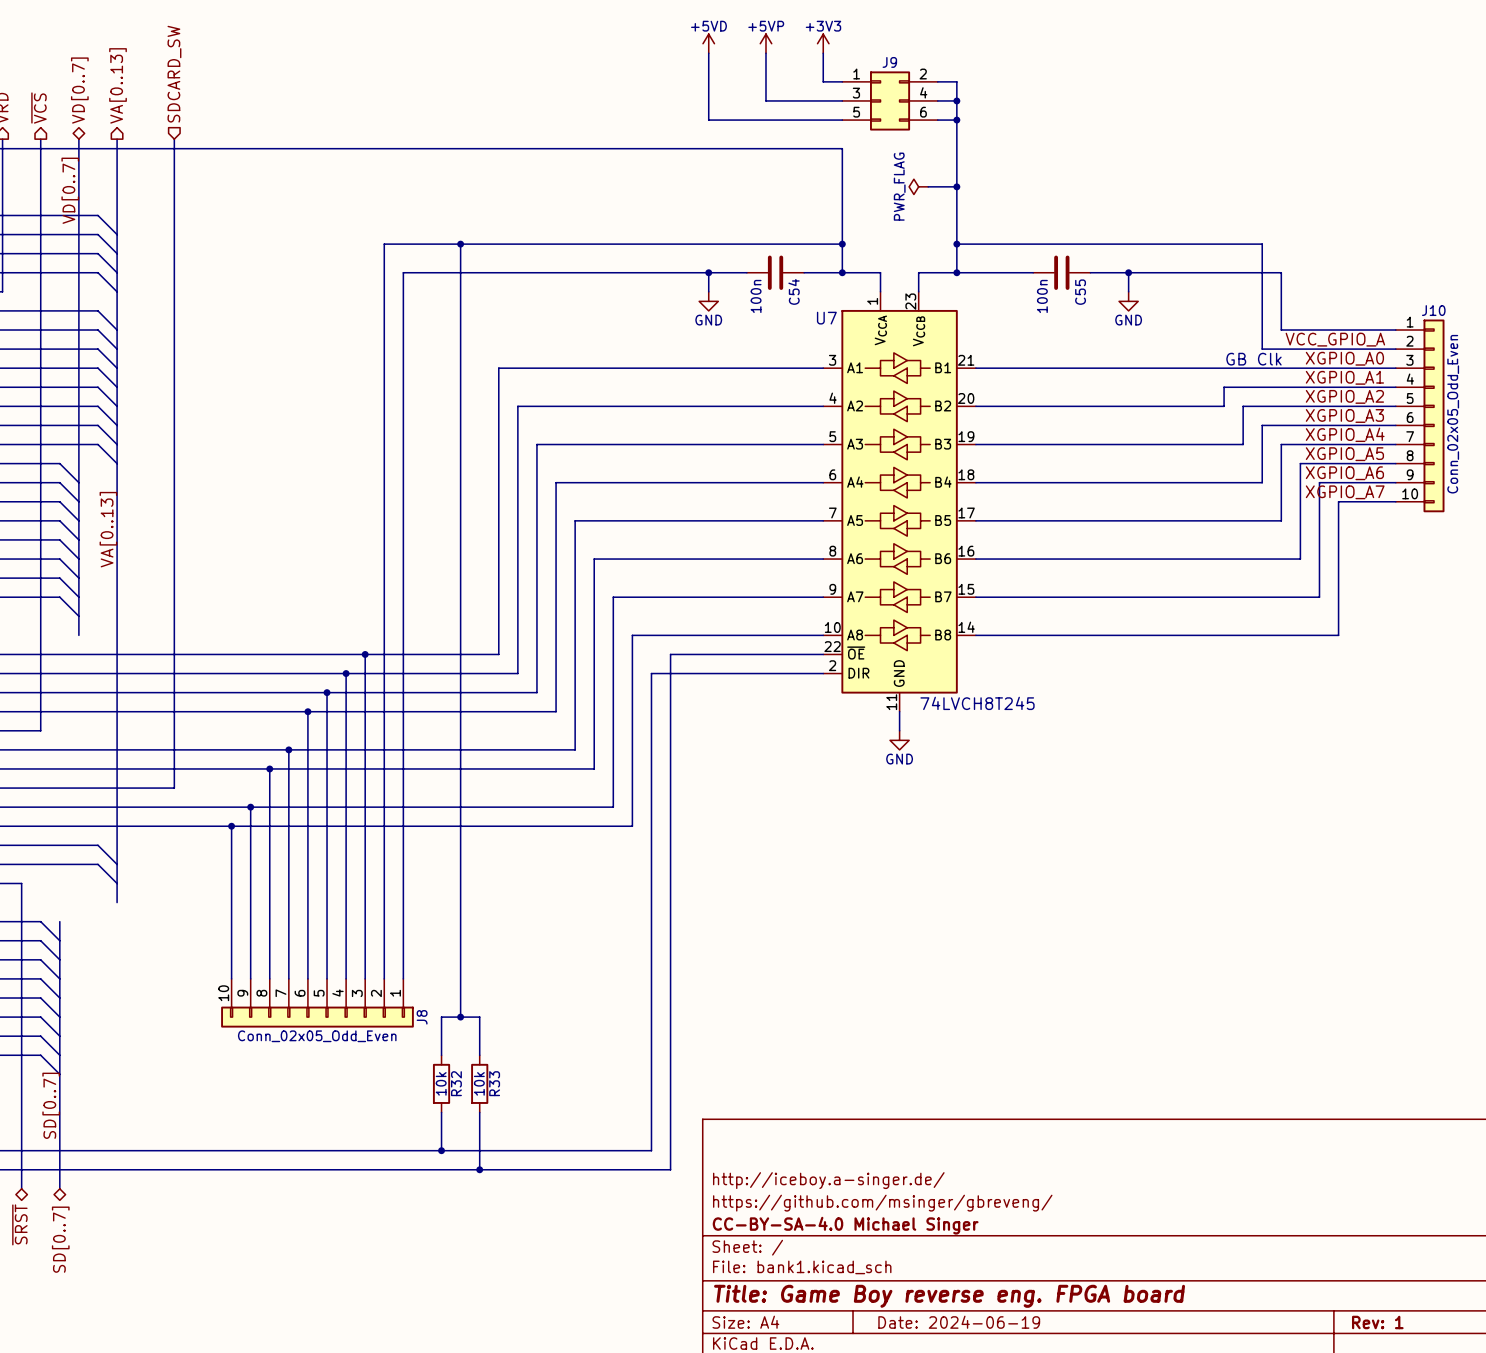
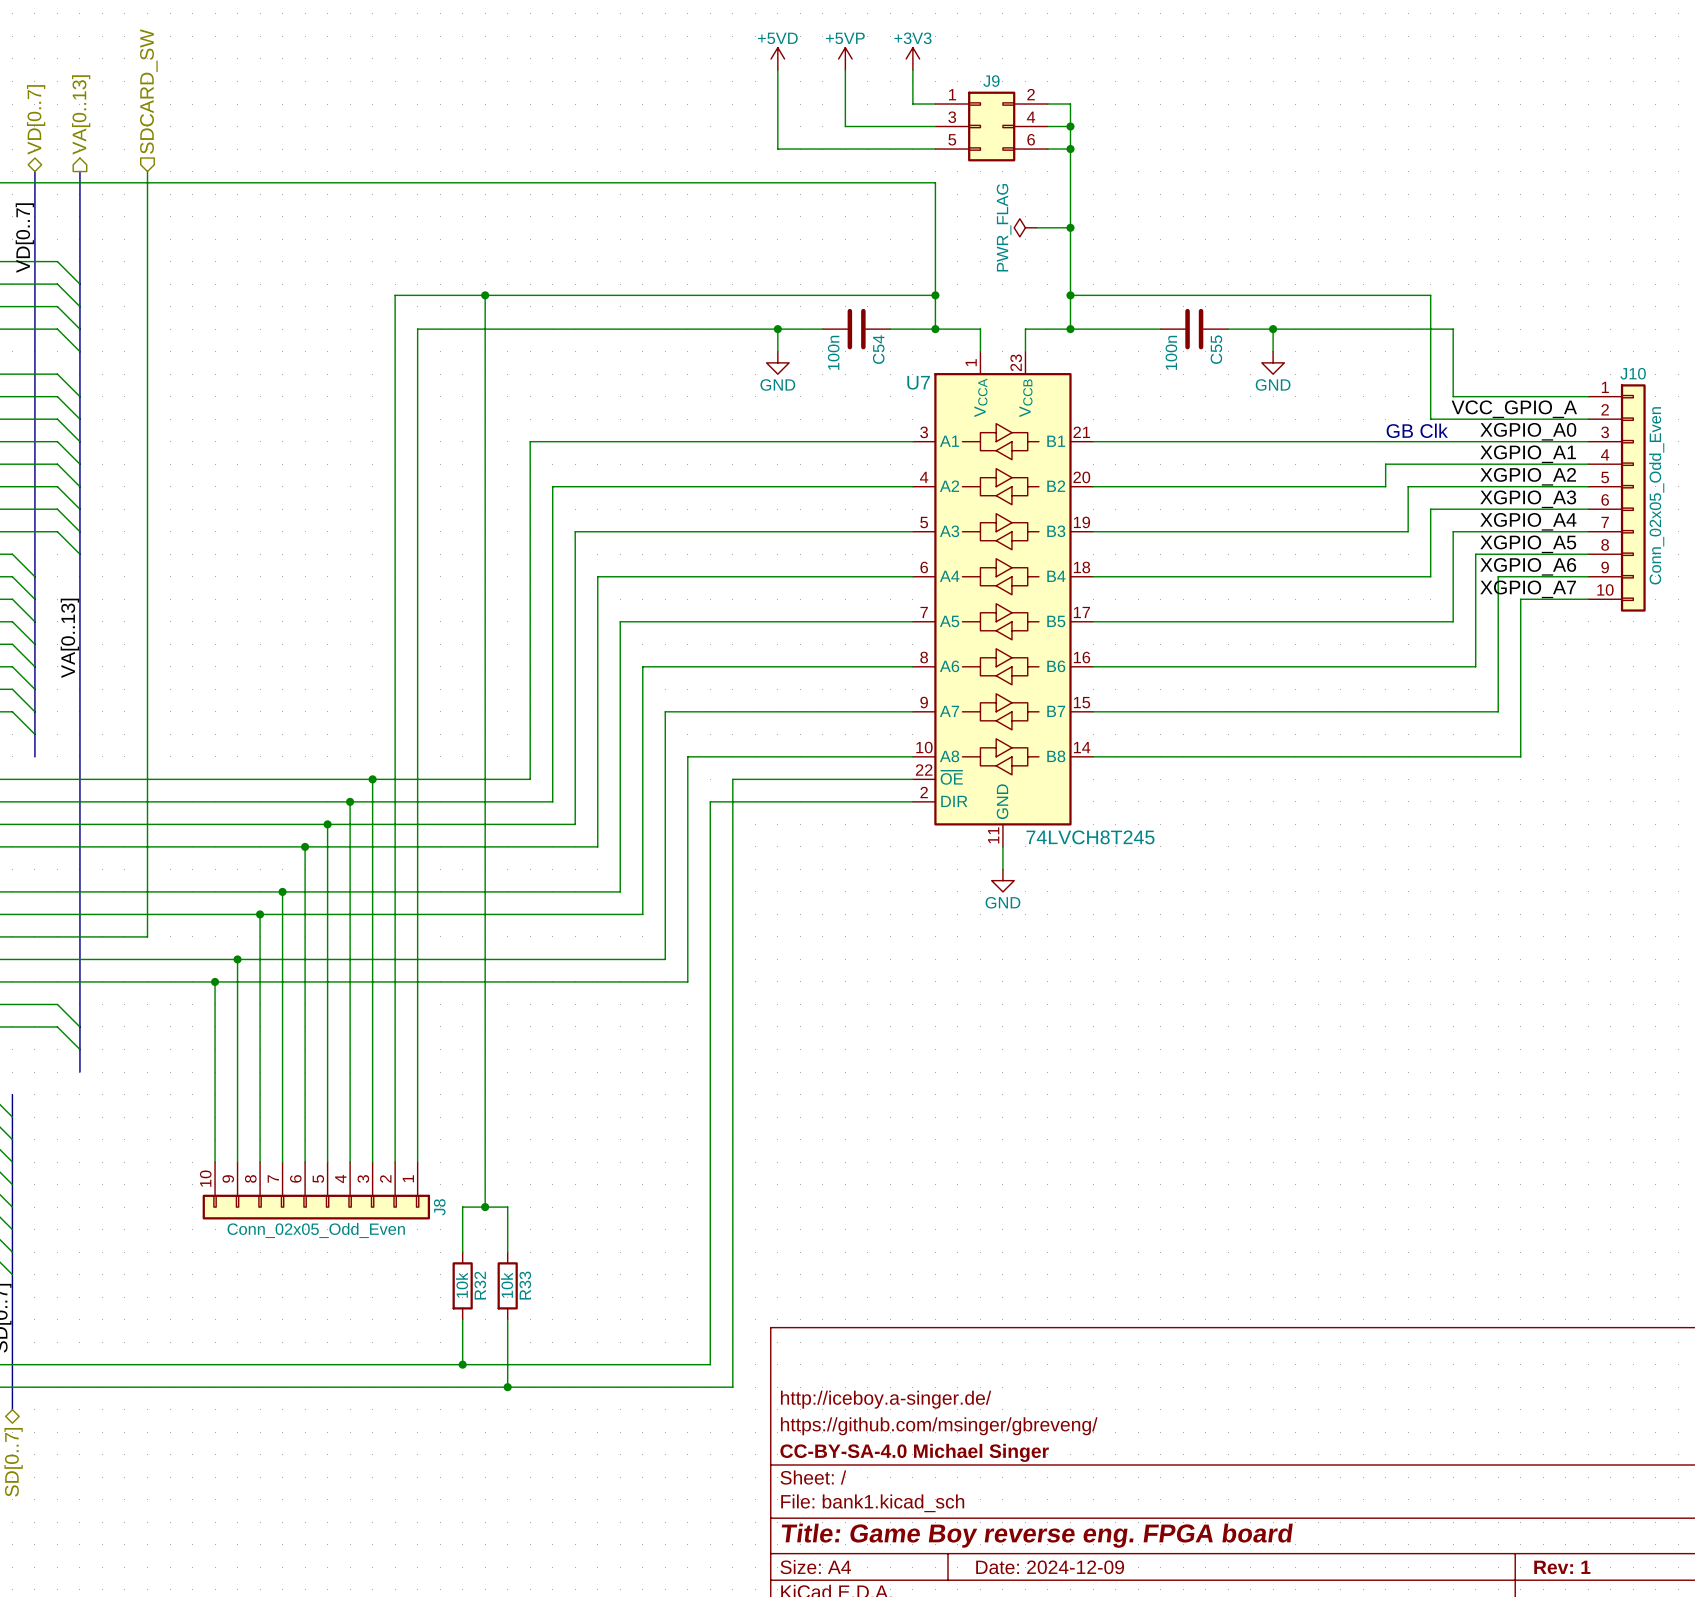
title block: Date: 2024-06-19 (959, 1322) -> Date: 2024-12-09 (1050, 1567)

